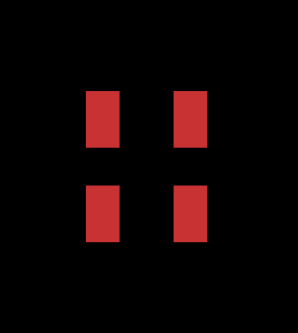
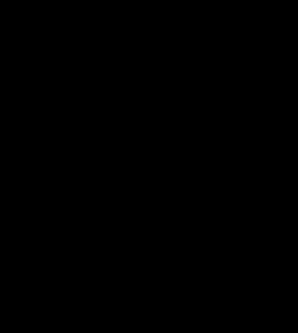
part: (146, 119) -> none
part: (146, 213) -> none

